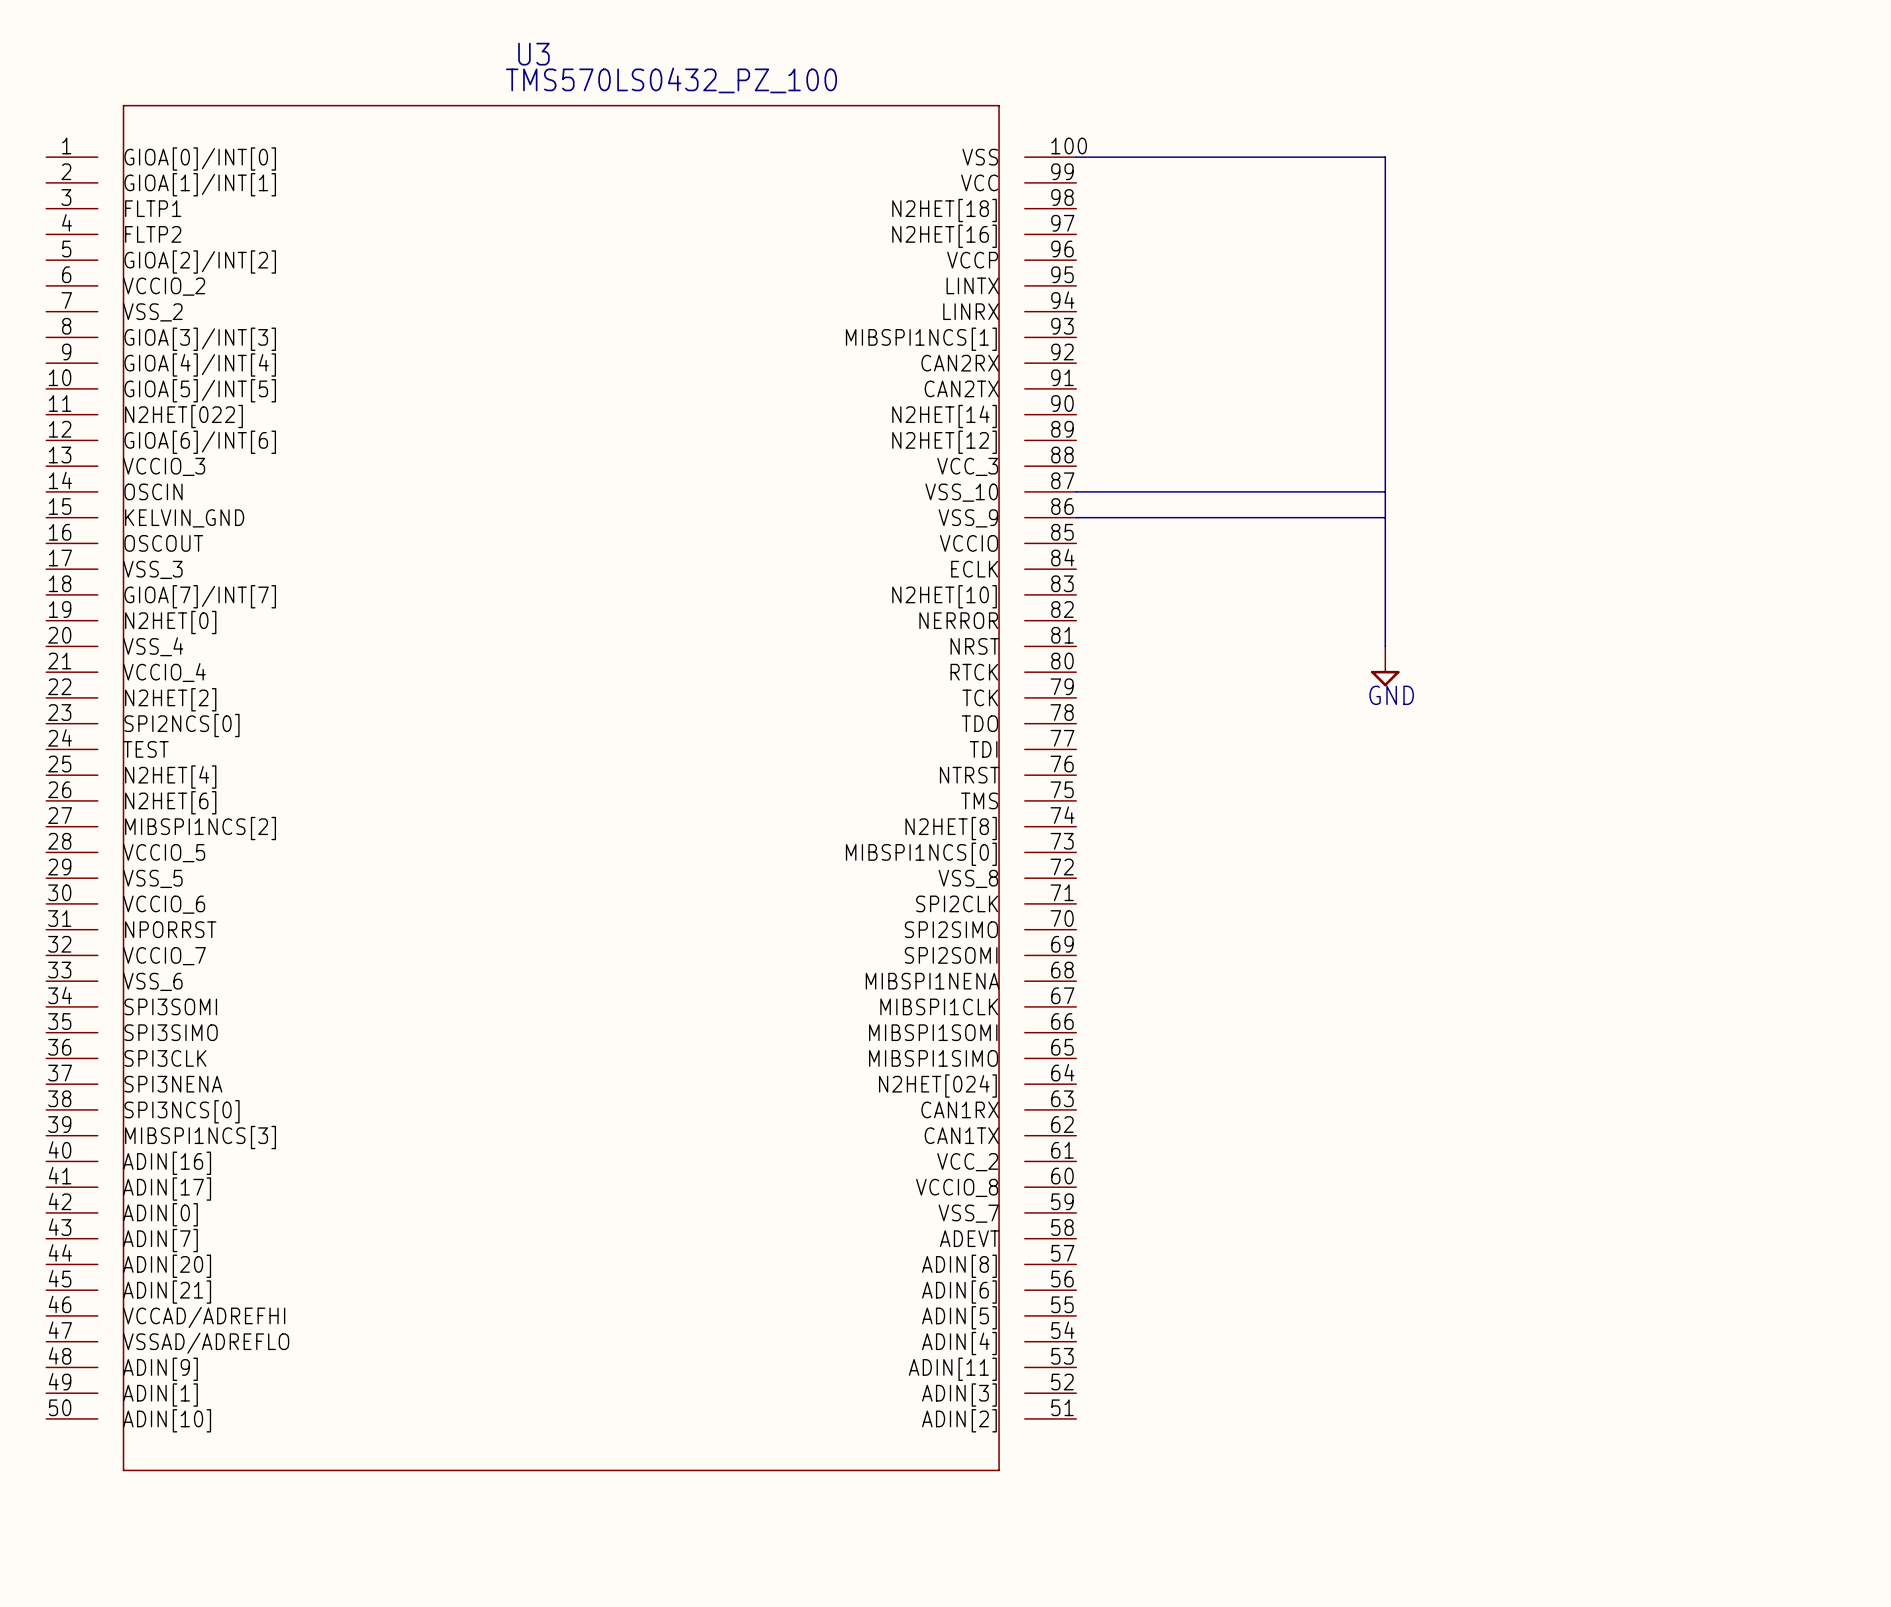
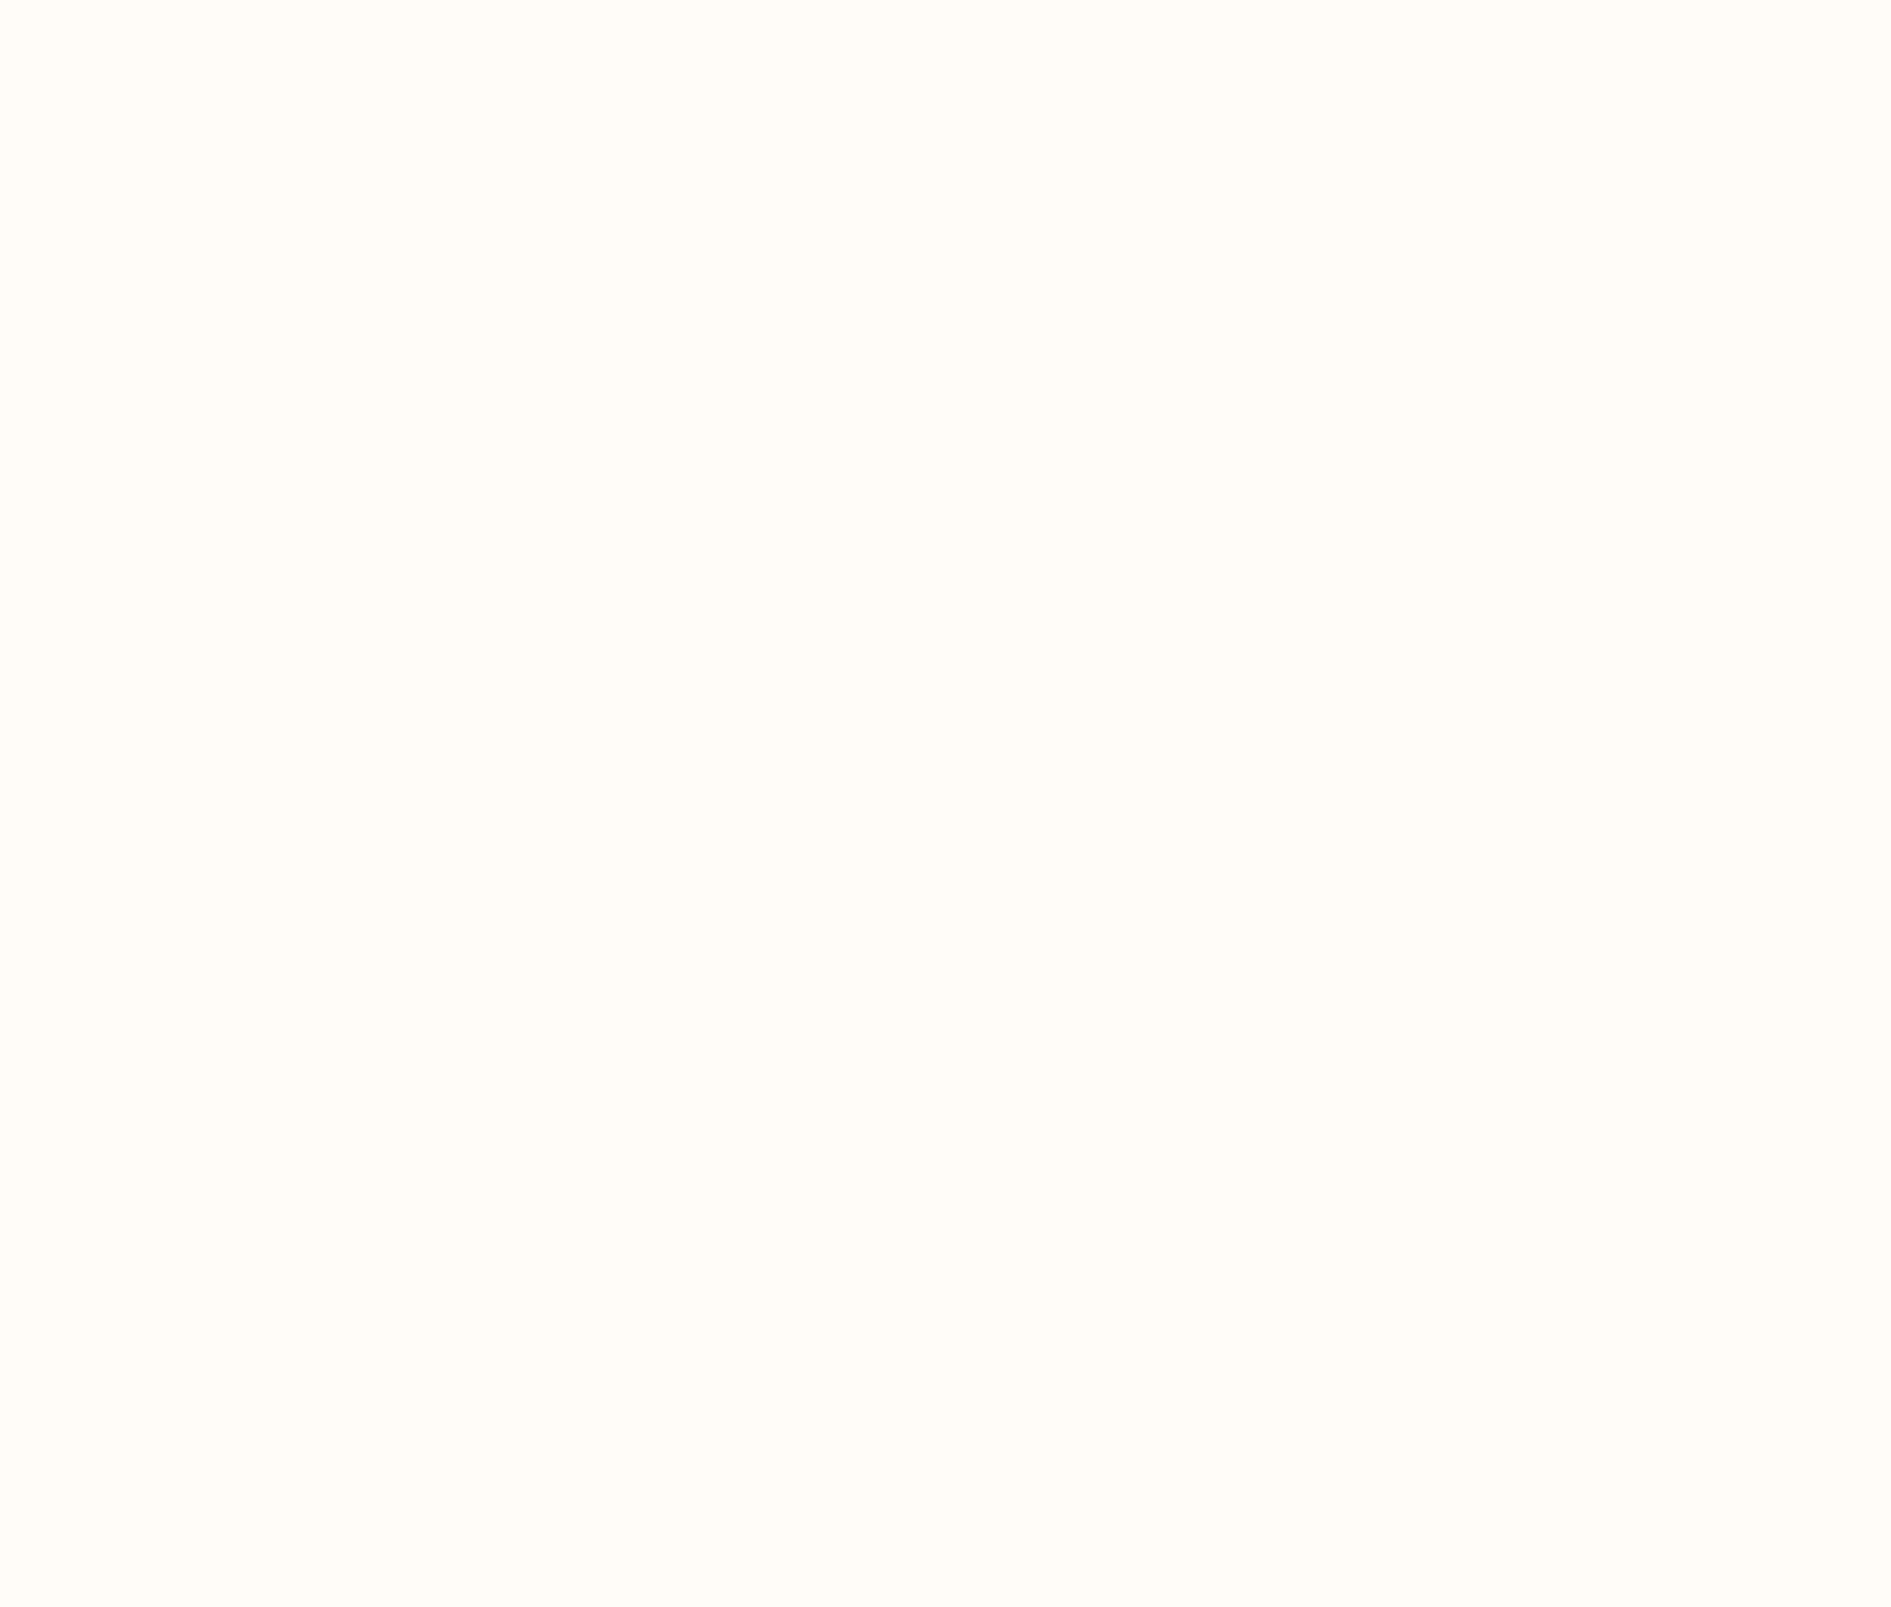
wire: (1076, 157) (1385, 157) (1385, 646) -> none
wire: (1076, 491) (1385, 491) -> none
wire: (1076, 517) (1385, 517) -> none
power symbol: GND (1385, 666) -> none
U3: TMS570LS0432_PZ_100 (561, 788) -> none

